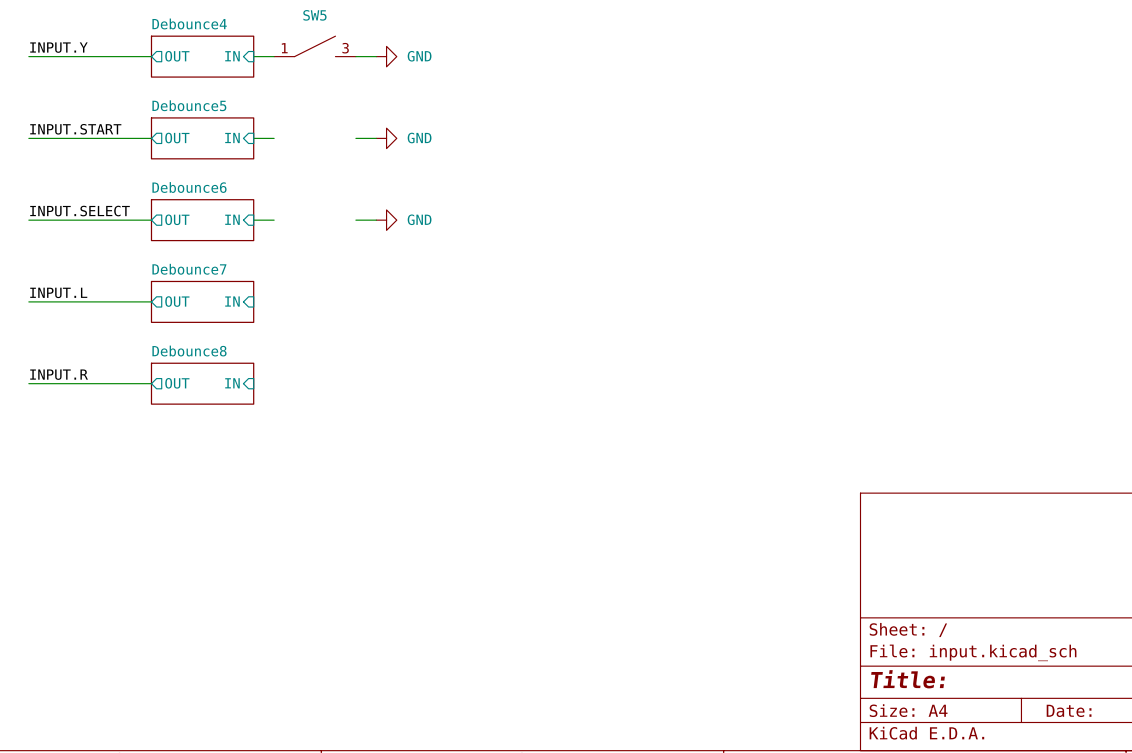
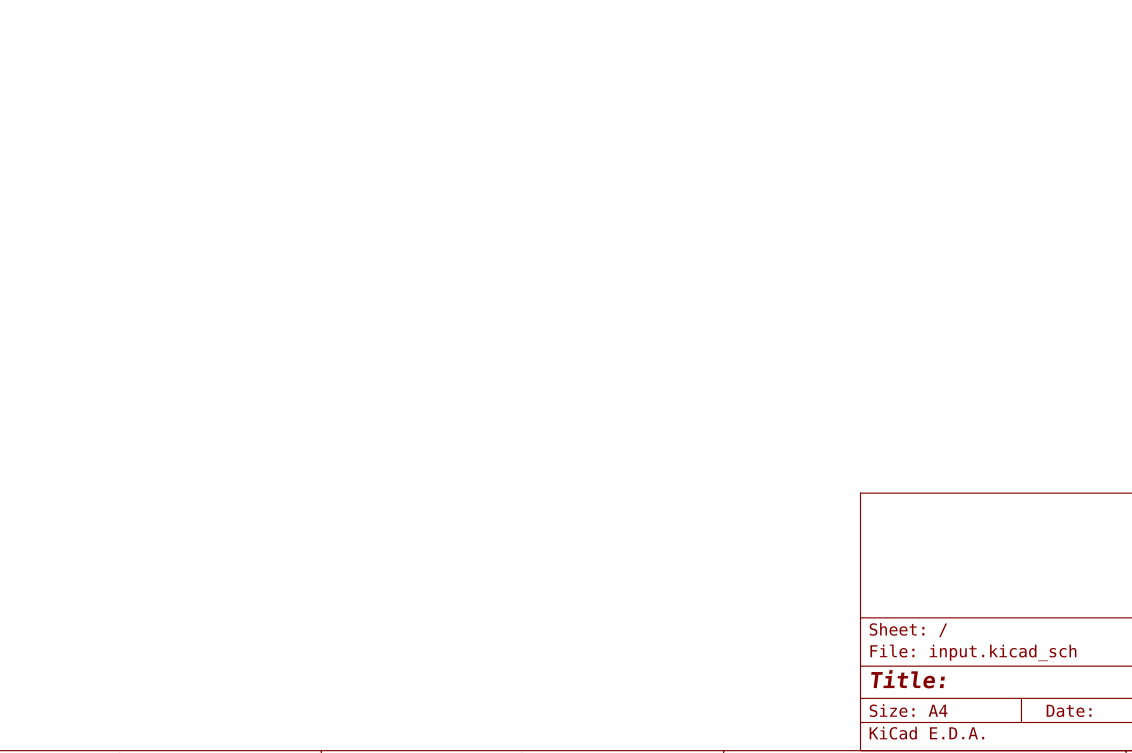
SW5: (315, 46) -> none
label: INPUT.Y (58, 47) -> none
wire: (28, 56) (151, 56) -> none
sheet pin: OUT (177, 56) -> none
sheet Debounce4: (202, 56) -> none
sheet pin: IN (232, 56) -> none
wire: (253, 56) (274, 56) -> none
wire: (355, 56) (376, 56) -> none
power symbol: GND (386, 56) -> none
label: INPUT.START (75, 129) -> none
wire: (28, 138) (151, 138) -> none
sheet pin: OUT (177, 138) -> none
sheet Debounce5: (202, 138) -> none
sheet pin: IN (232, 138) -> none
wire: (253, 138) (274, 138) -> none
wire: (355, 138) (376, 138) -> none
power symbol: GND (386, 138) -> none
label: INPUT.SELECT (80, 211) -> none
sheet pin: OUT (177, 219) -> none
sheet pin: IN (232, 219) -> none
wire: (28, 220) (151, 220) -> none
sheet Debounce6: (202, 220) -> none
wire: (253, 220) (274, 220) -> none
wire: (355, 220) (376, 220) -> none
power symbol: GND (386, 220) -> none
label: INPUT.L (58, 292) -> none
wire: (28, 301) (151, 301) -> none
sheet pin: OUT (177, 301) -> none
sheet Debounce7: (202, 301) -> none
sheet pin: IN (232, 301) -> none
label: INPUT.R (59, 374) -> none
wire: (28, 383) (151, 383) -> none
sheet pin: OUT (177, 383) -> none
sheet Debounce8: (202, 383) -> none
sheet pin: IN (232, 383) -> none

